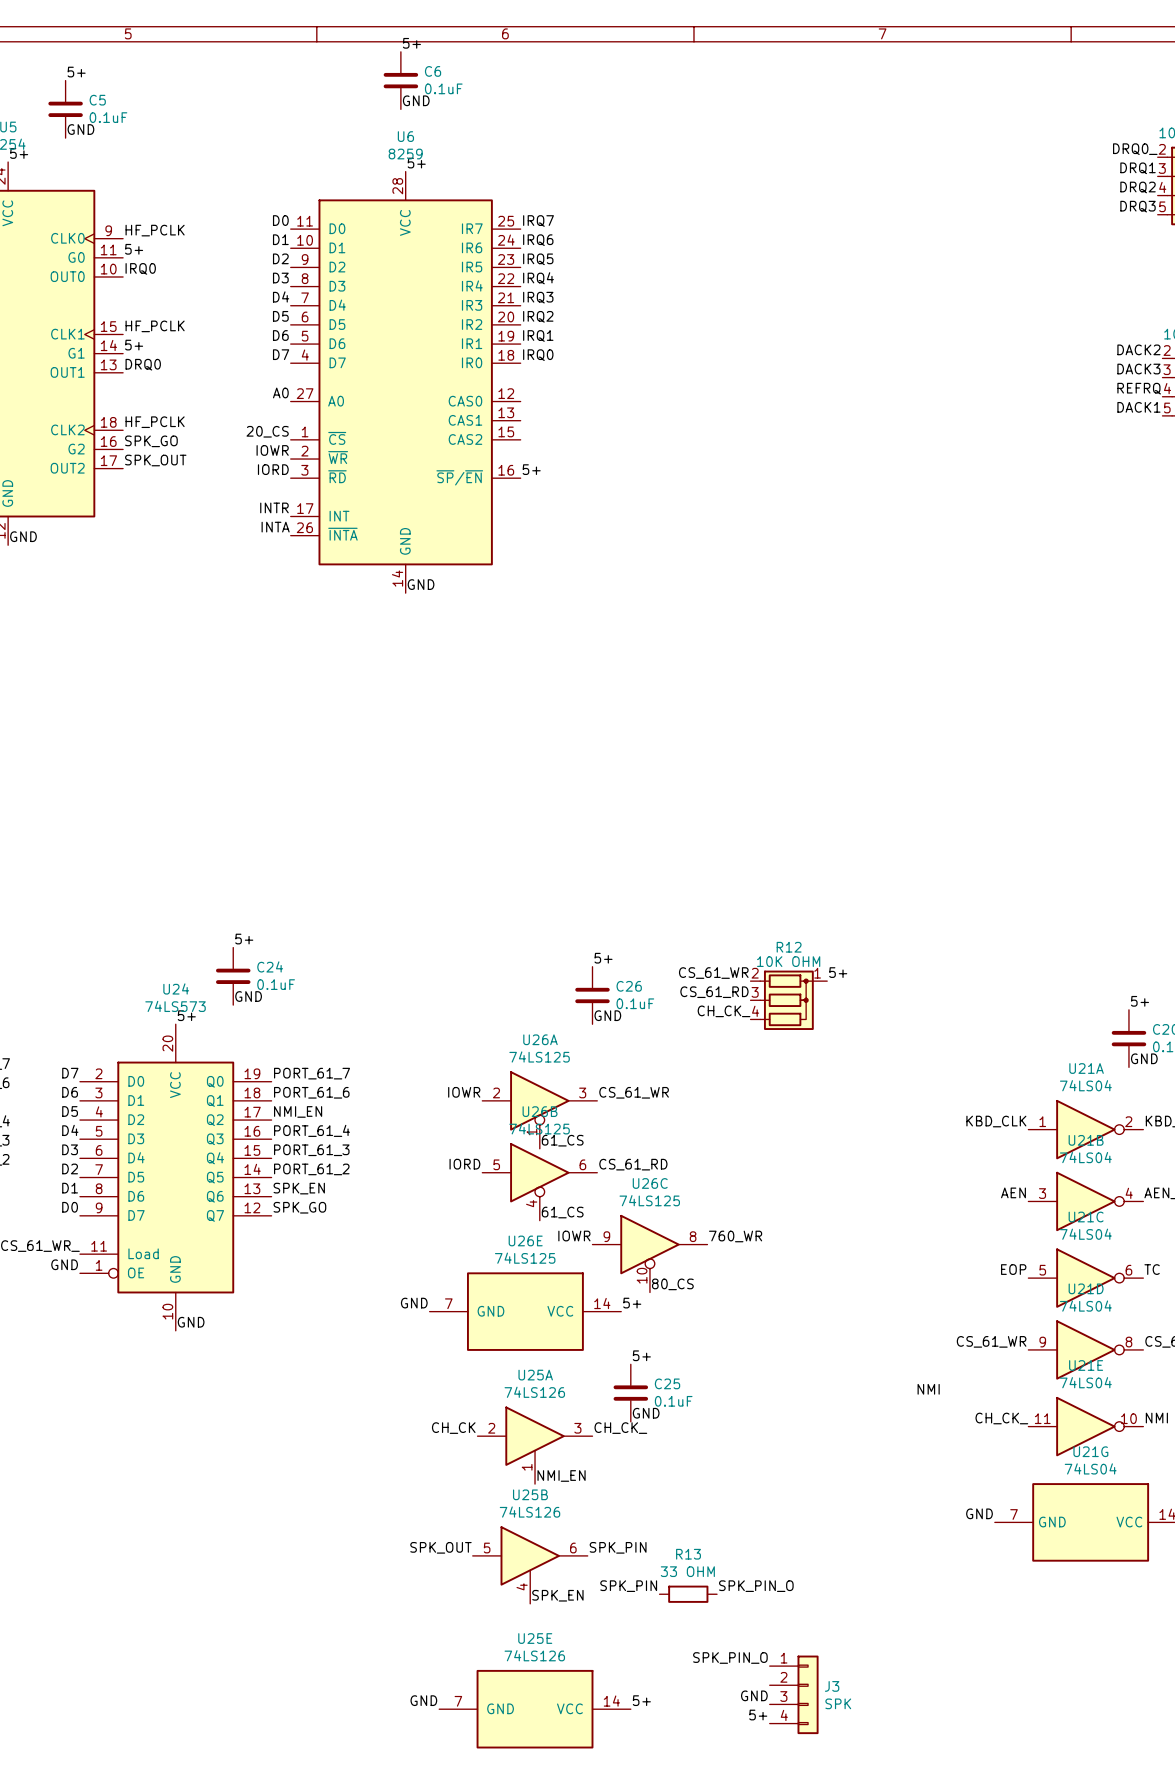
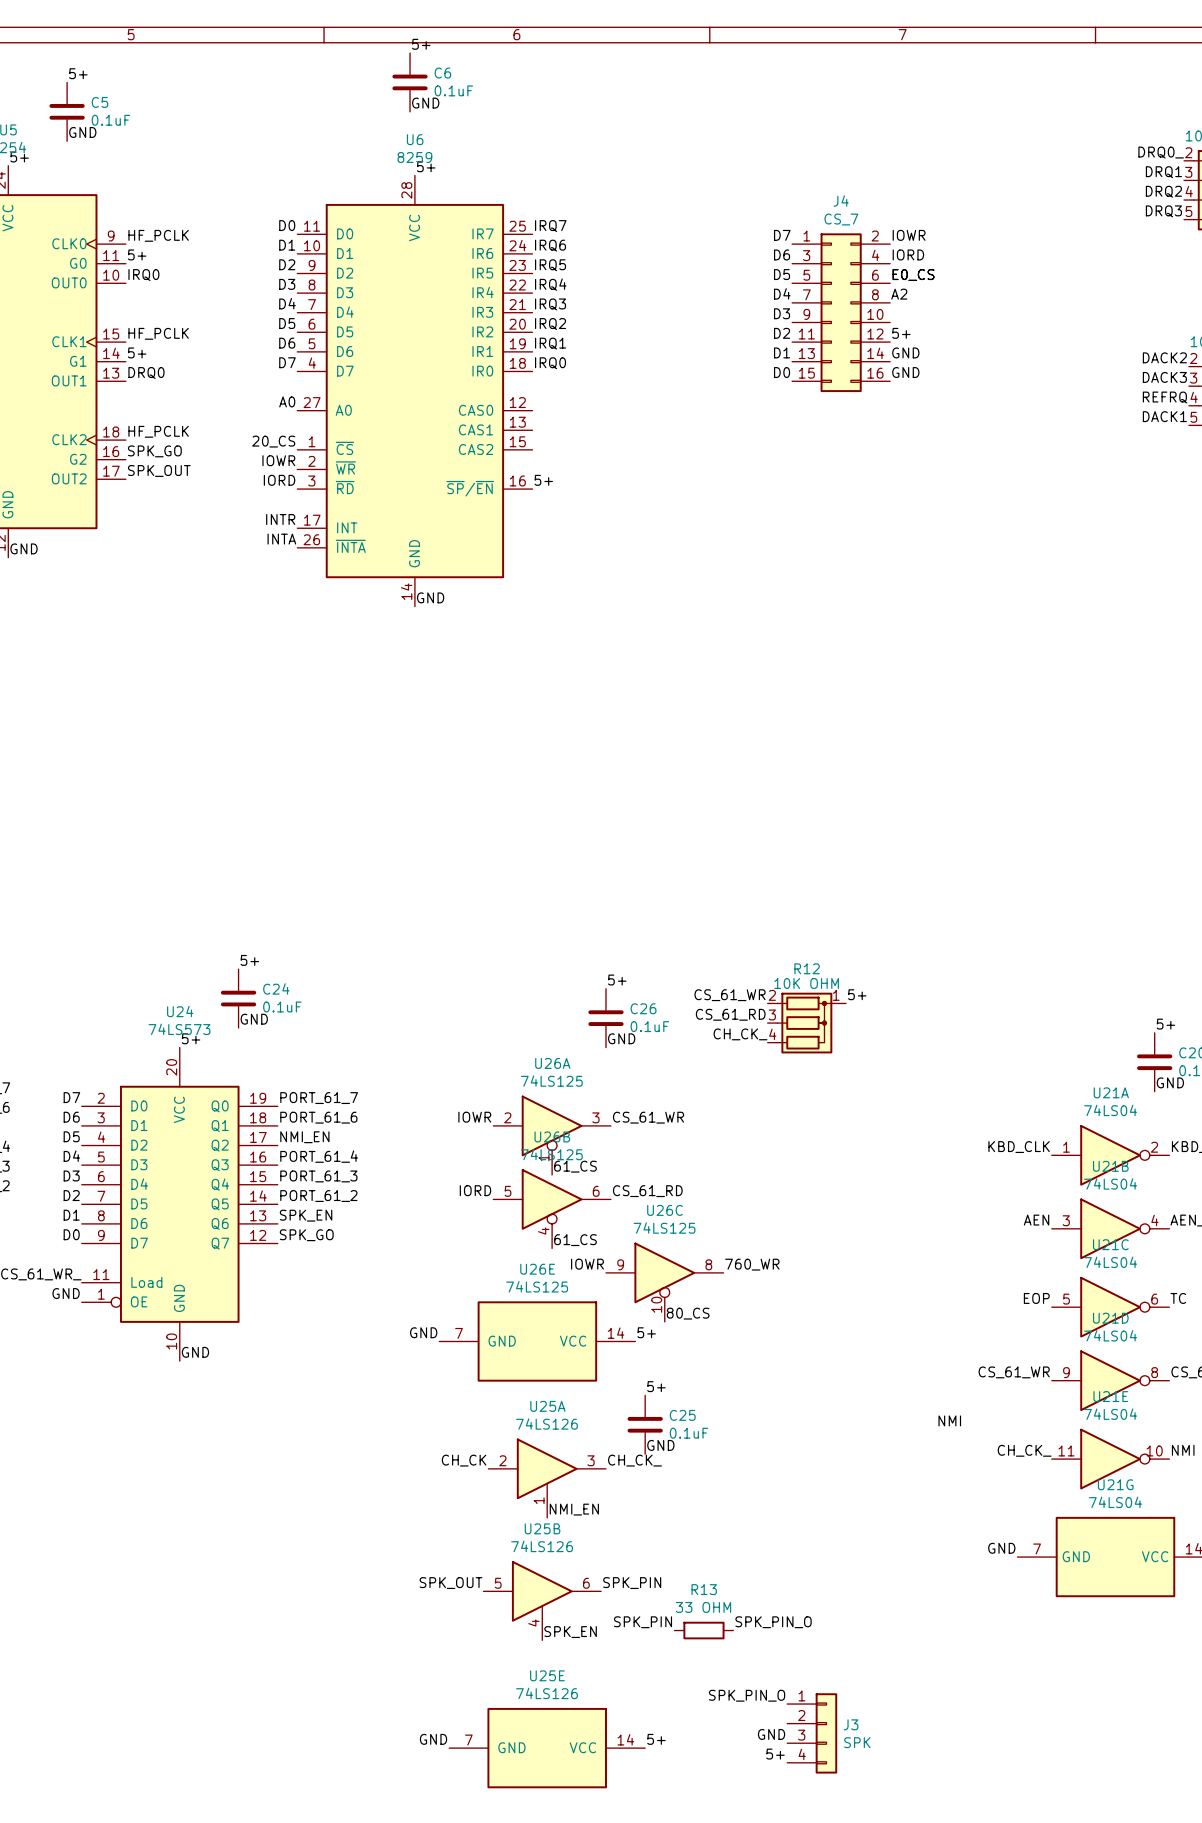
label: none -> D7 (782, 235)
label: none -> IOWR (909, 235)
label: none -> D6 (782, 254)
label: none -> IORD (908, 254)
label: none -> D5 (782, 274)
label: none -> E0_CS (913, 275)
label: none -> D4 (782, 293)
label: none -> A2 (899, 294)
J4: none -> CS_7 (841, 312)
label: none -> D3 (782, 313)
label: none -> D2 (782, 333)
label: none -> 5+ (901, 333)
label: none -> D1 (782, 352)
label: none -> GND (905, 352)
label: none -> D0 (782, 372)
label: none -> GND (905, 372)

